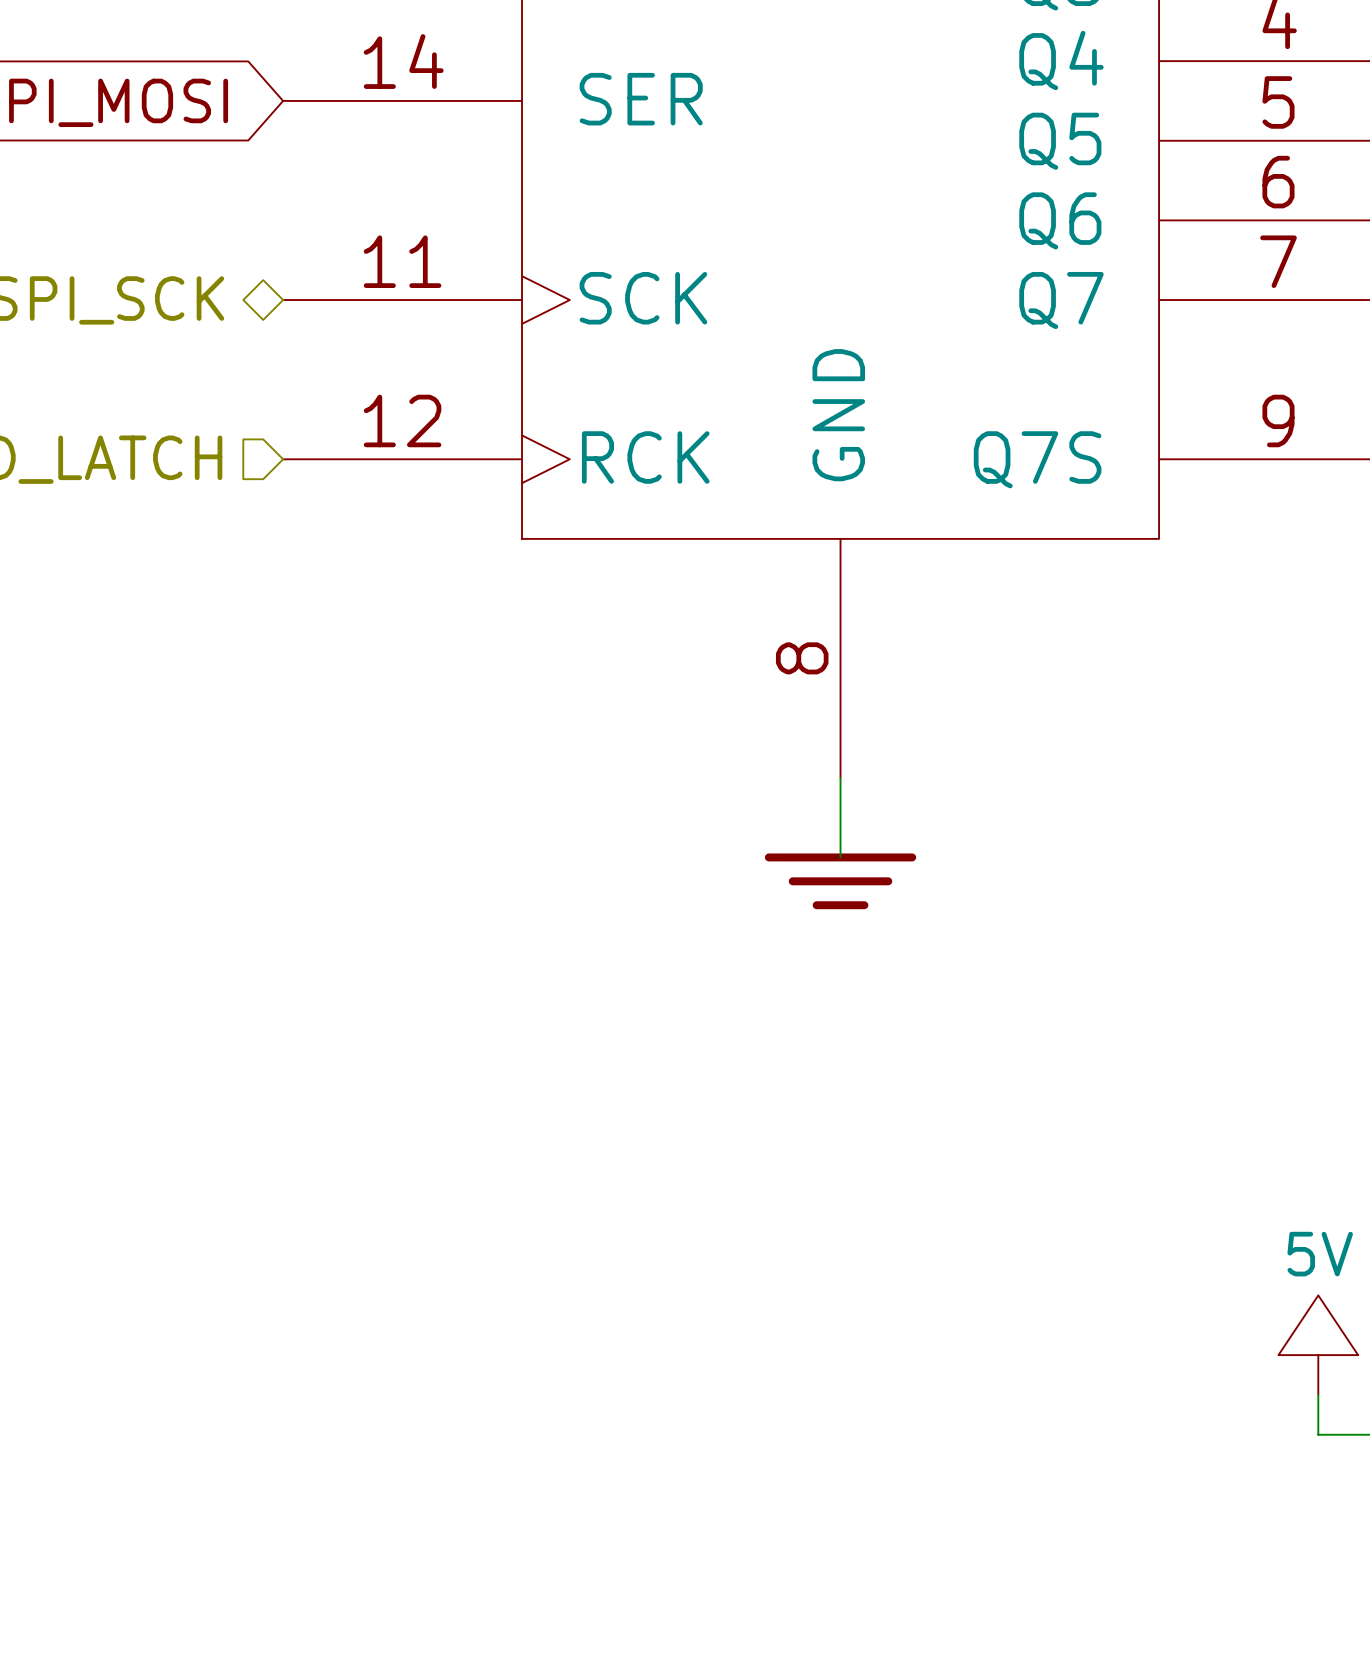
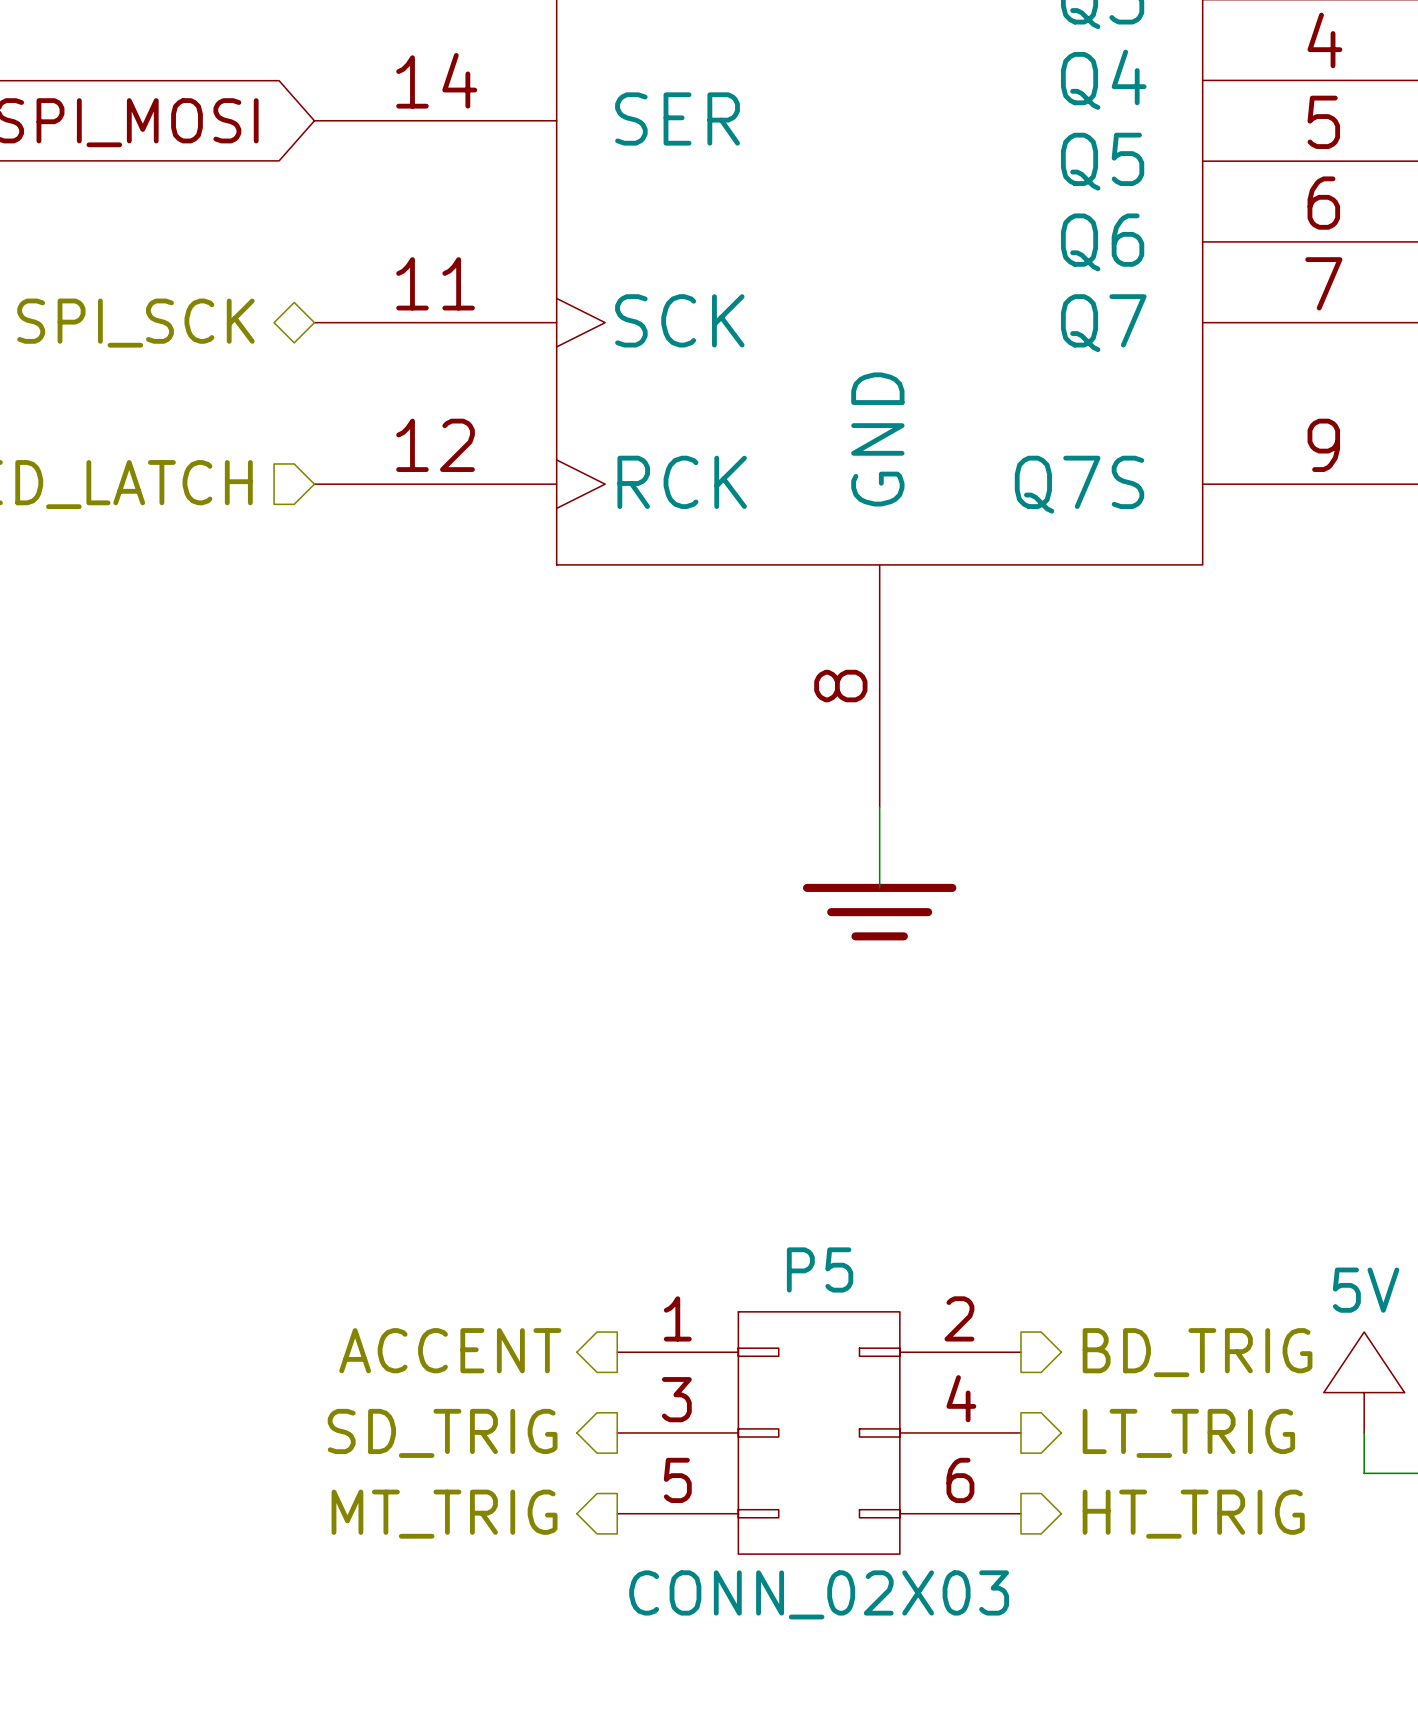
hierarchical label: none -> ACCENT (450, 1350)
hierarchical label: none -> BD_TRIG (1197, 1352)
P5: none -> CONN_02X03 (819, 1432)
hierarchical label: none -> SD_TRIG (442, 1433)
hierarchical label: none -> LT_TRIG (1188, 1433)
hierarchical label: none -> MT_TRIG (444, 1514)
hierarchical label: none -> HT_TRIG (1193, 1514)

